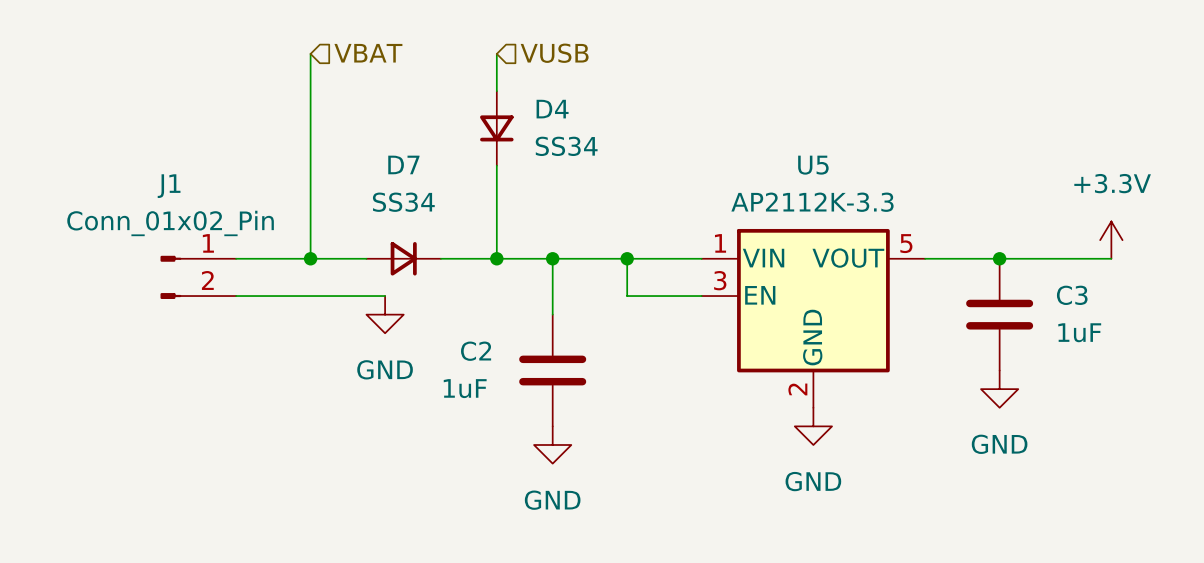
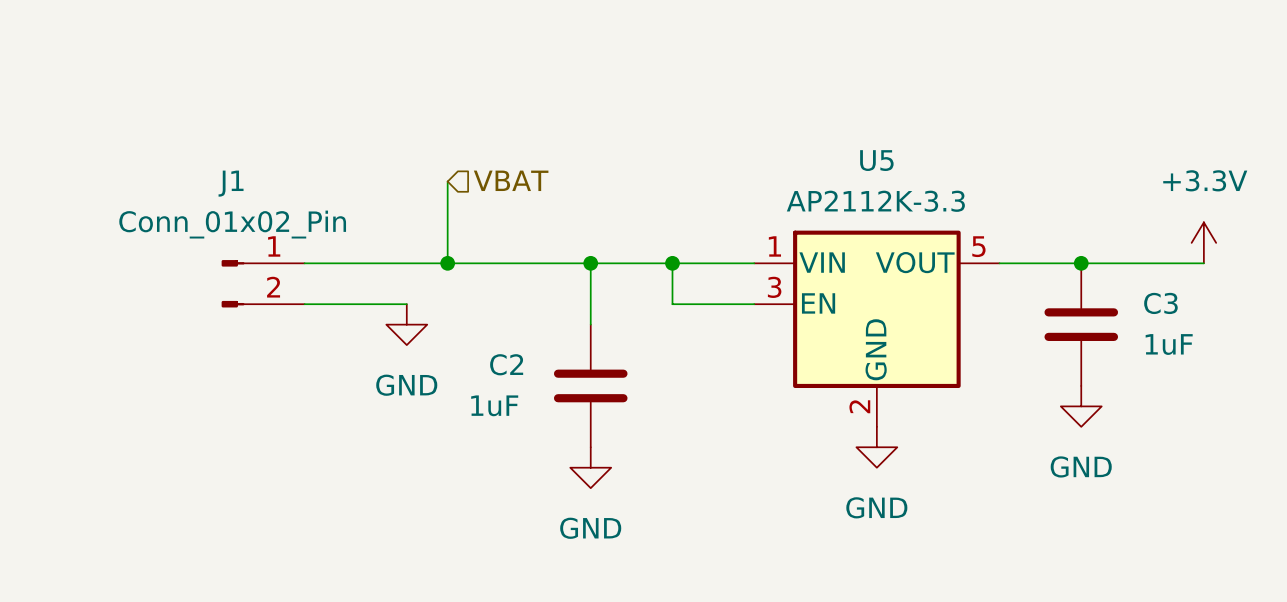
wire: (310, 53) (310, 258) -> none
hierarchical label position: VBAT (368, 53) -> VBAT (511, 180)
wire: (496, 53) (496, 91) -> none
hierarchical label: VUSB (554, 53) -> none
D4: SS34 (496, 128) -> none
wire: (496, 165) (496, 258) -> none
wire: none -> (447, 181) (447, 263)
junction: (310, 258) -> none
D7: SS34 (403, 258) -> none
junction: none -> (447, 263)
junction: (496, 258) -> none
J1 position: (198, 277) -> (263, 283)

